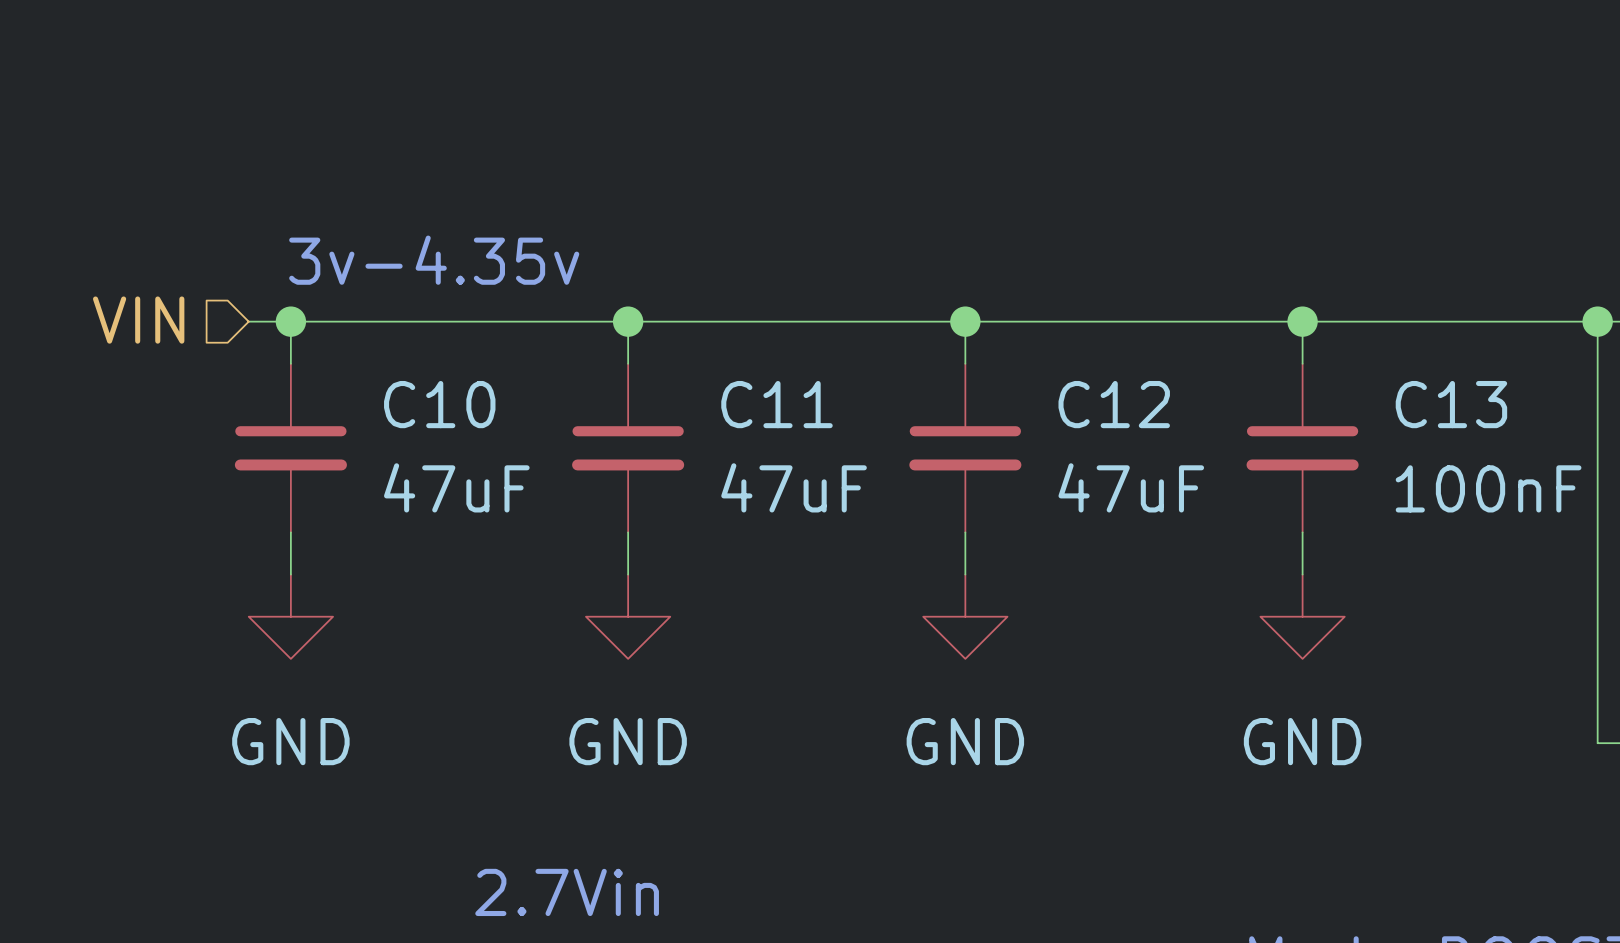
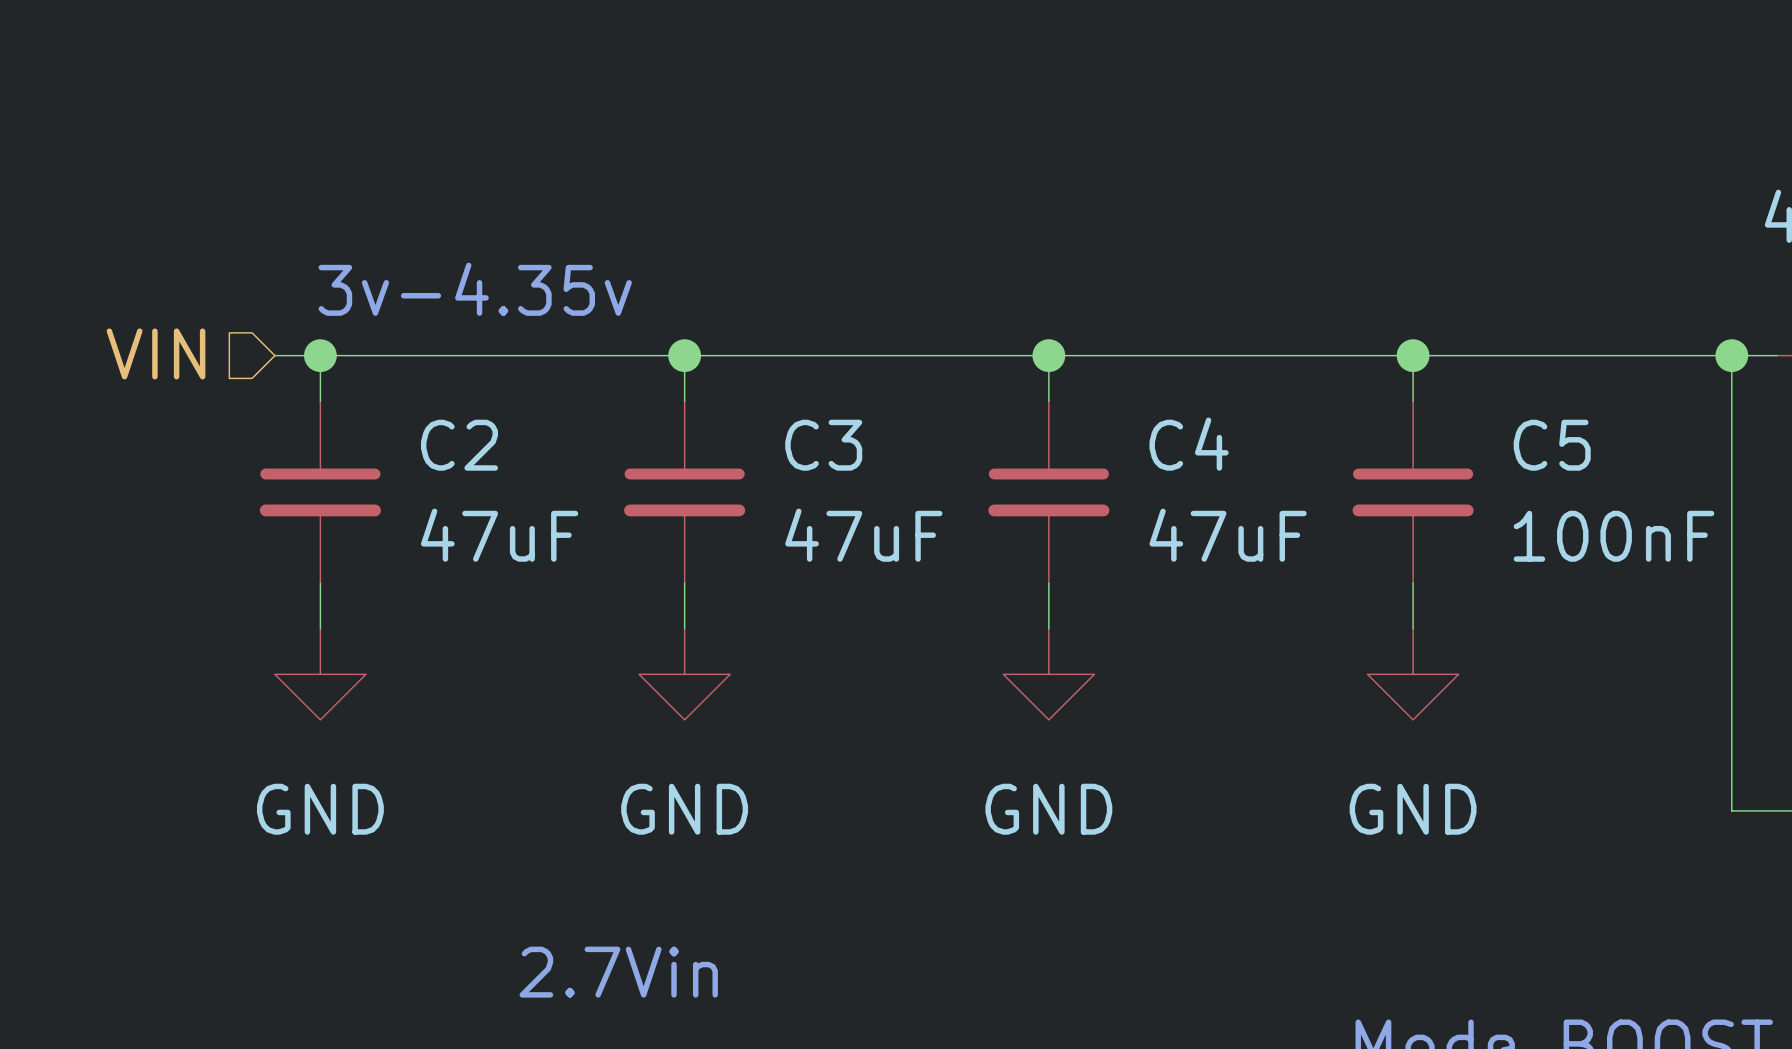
C10 name: C10 (439, 404) -> C2 (459, 445)
C11 name: C11 (776, 404) -> C3 (823, 445)
C12 name: C12 (1114, 404) -> C4 (1189, 444)
C13 name: C13 (1451, 404) -> C5 (1552, 445)

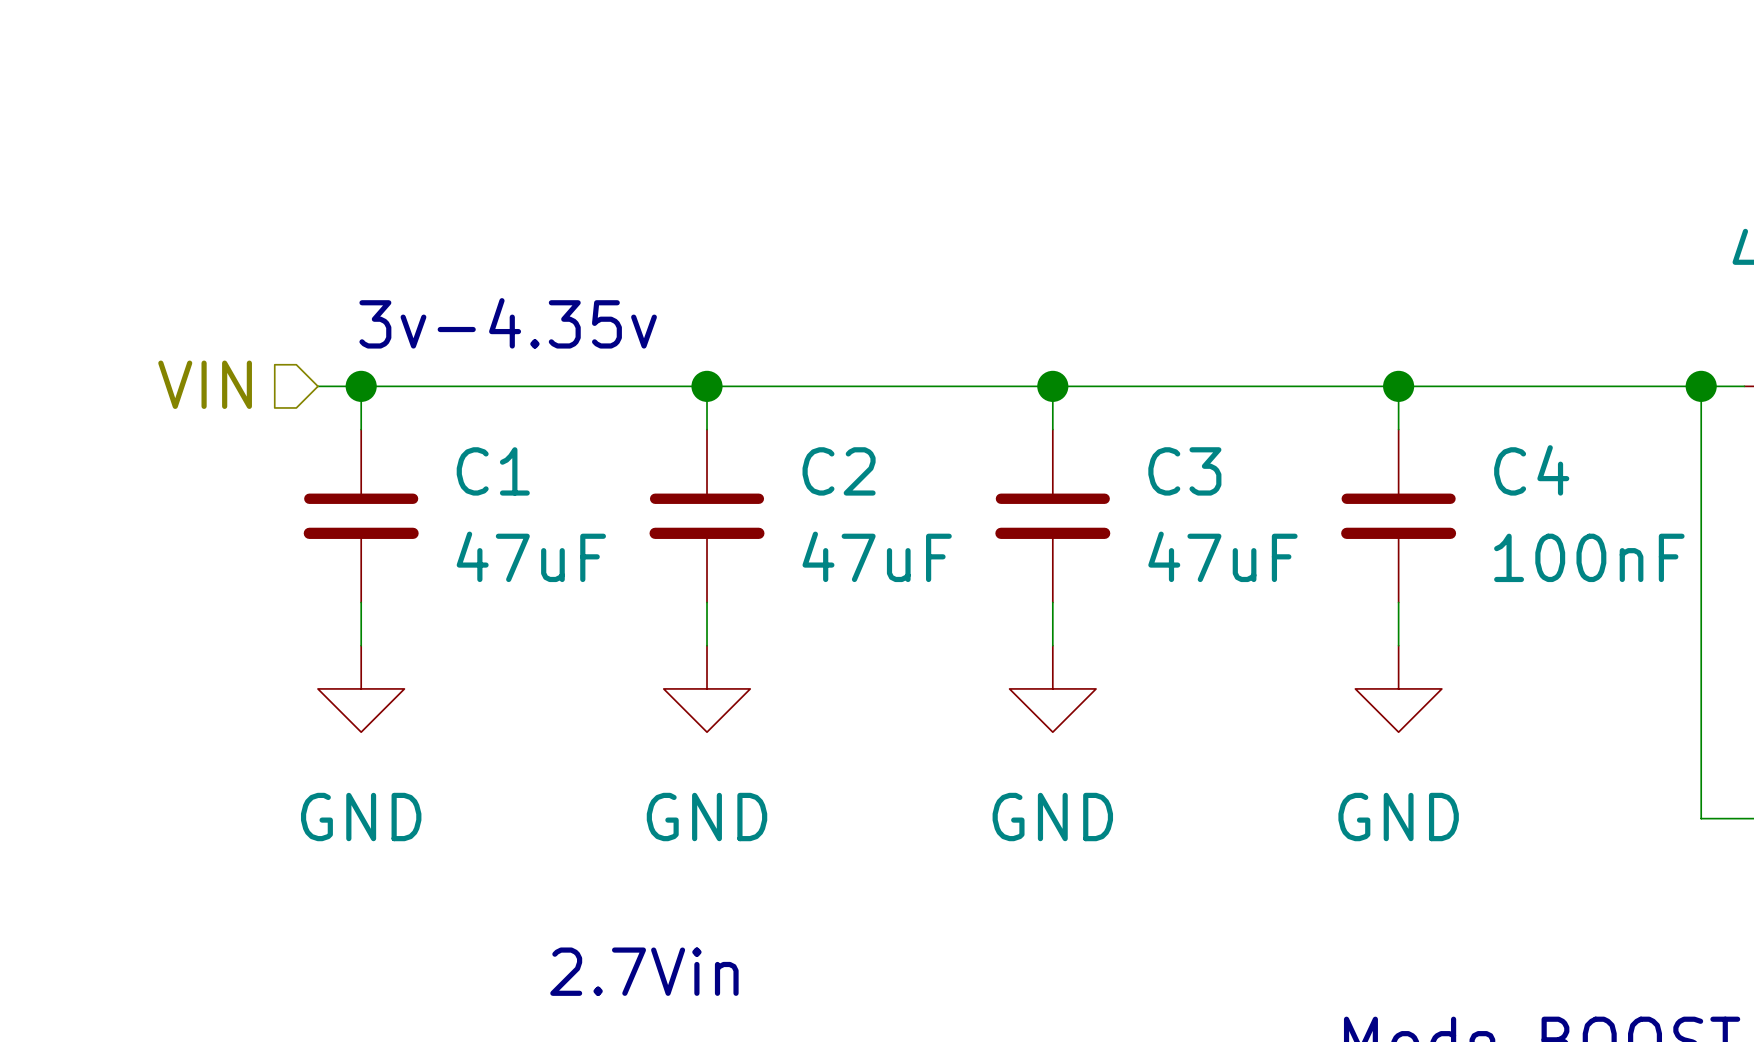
C4 name: C4 (1189, 444) -> C3 (1184, 471)
C2 name: C2 (459, 445) -> C1 (493, 471)
C3 name: C3 (823, 445) -> C2 (839, 471)
C5 name: C5 (1552, 445) -> C4 (1531, 470)

